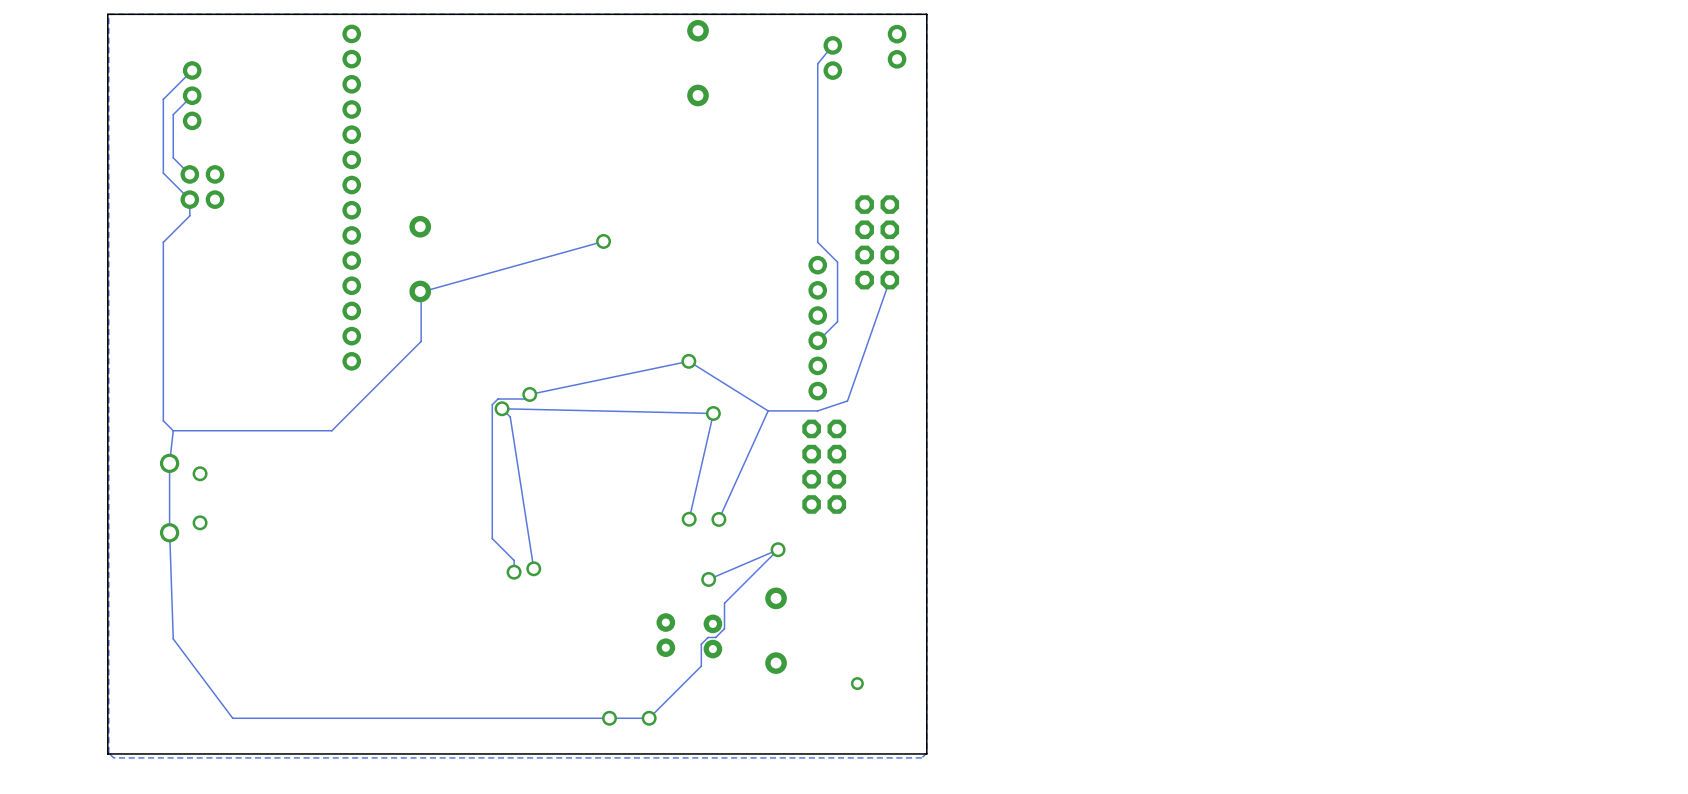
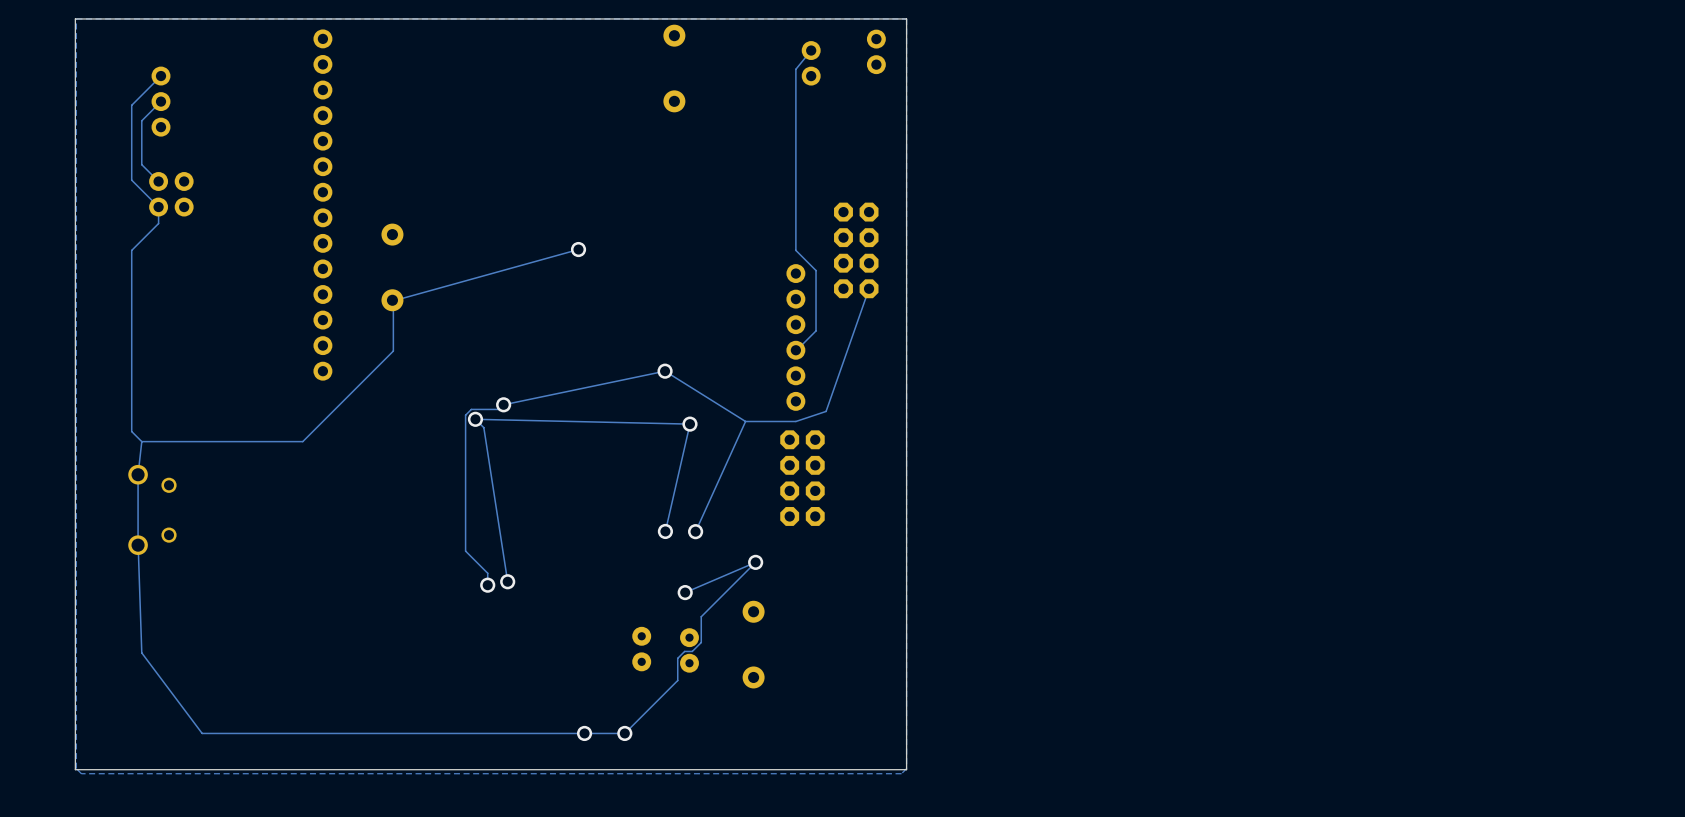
via: (857, 683) -> none

